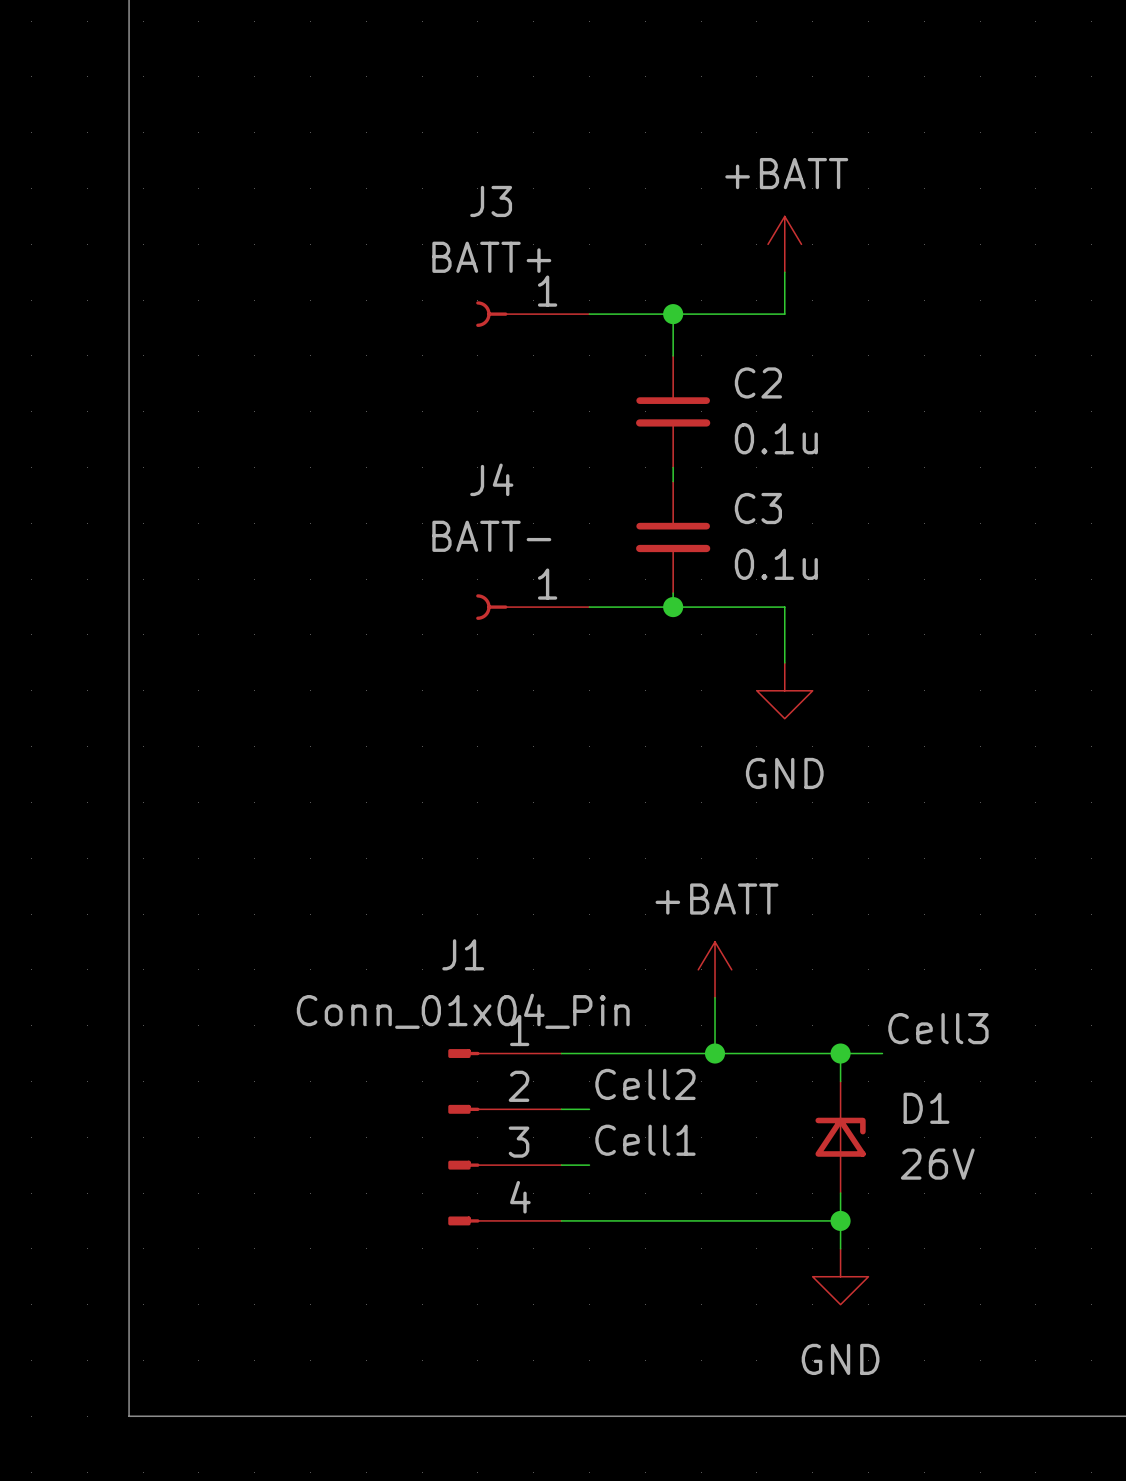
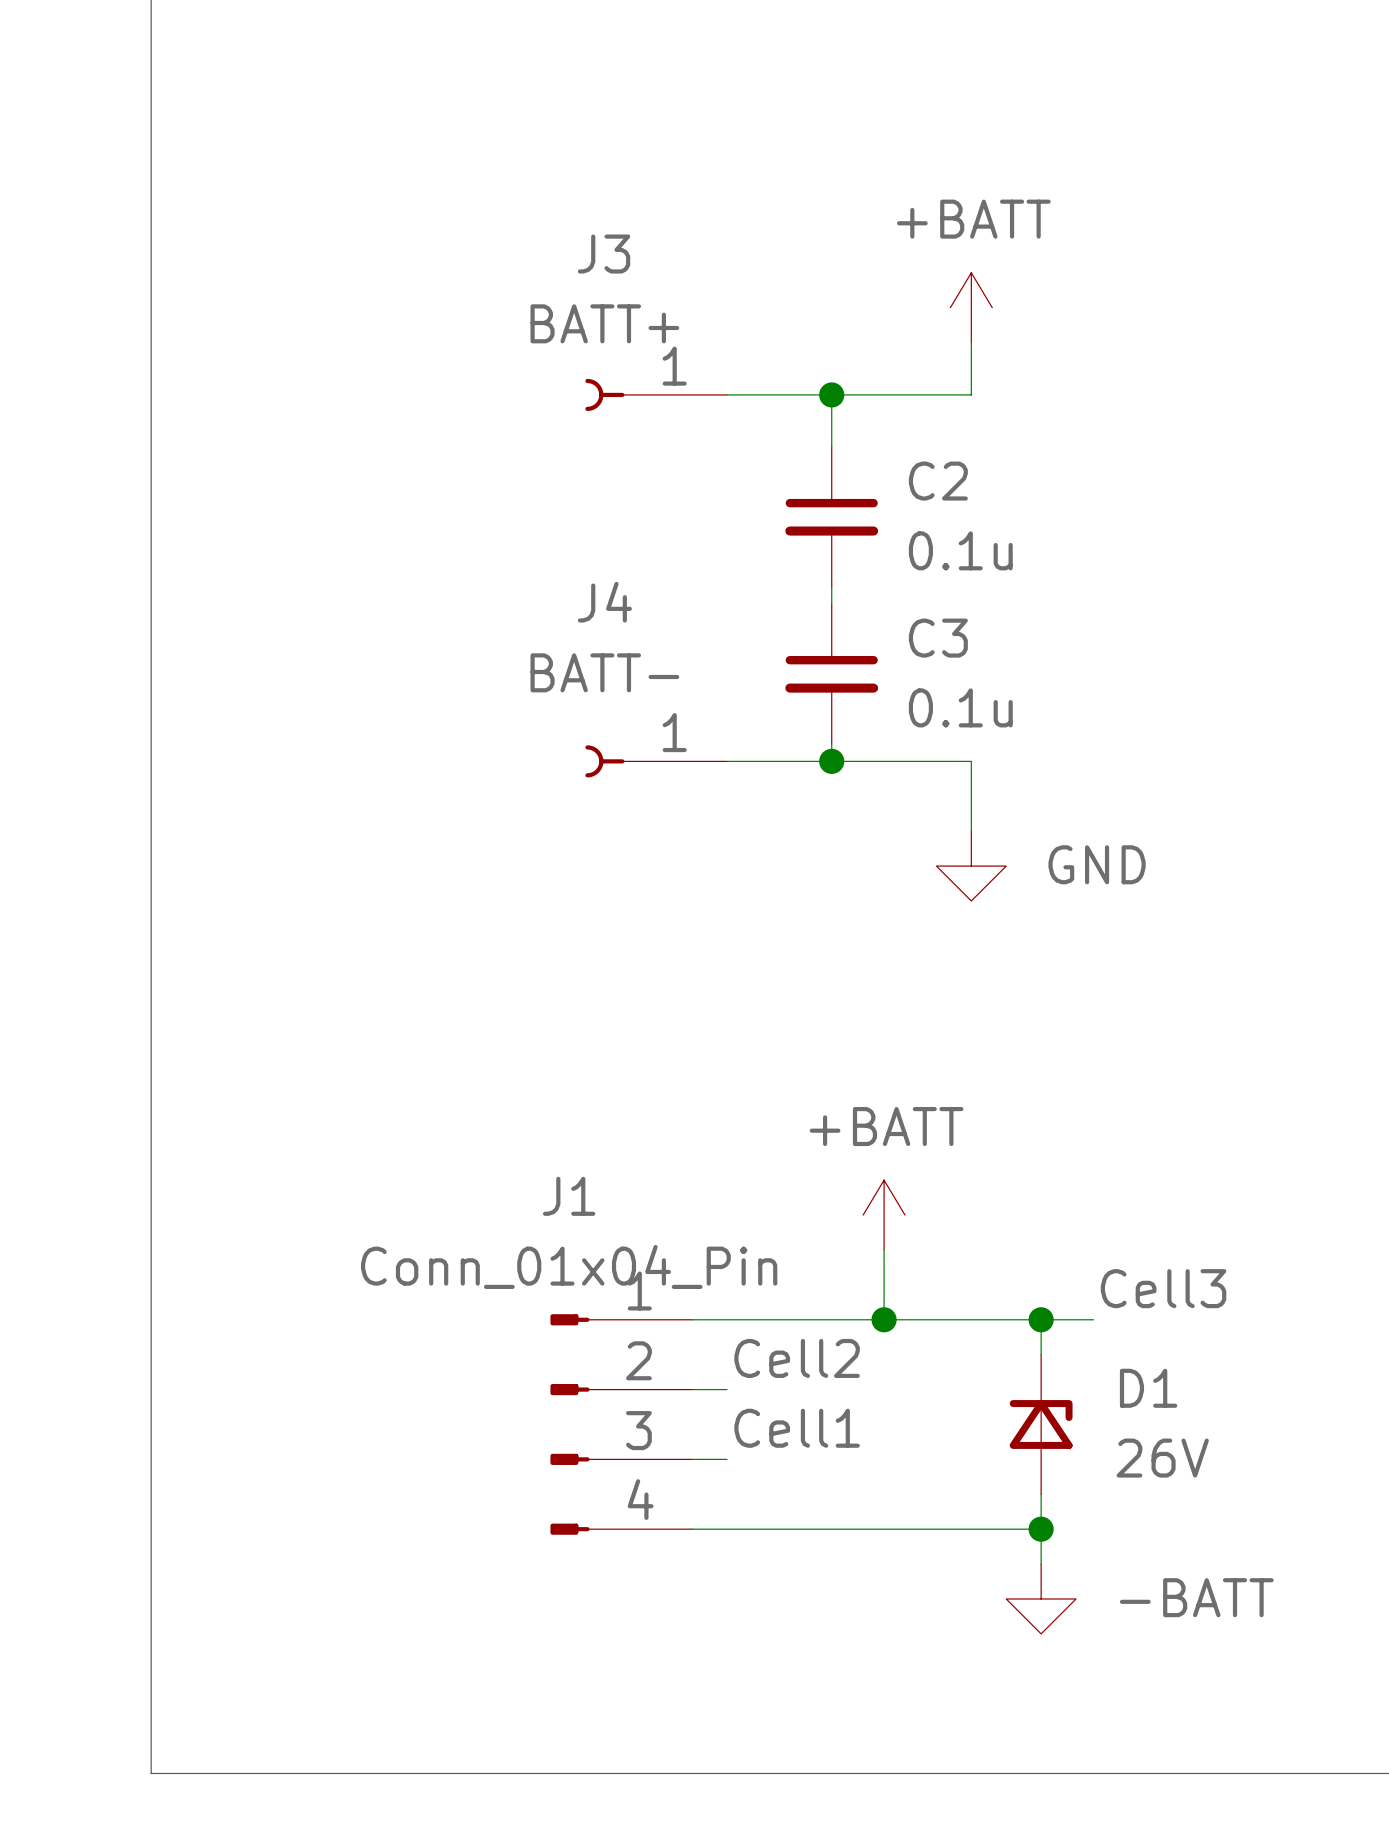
power symbol text position: GND (784, 773) -> GND (1097, 864)
power symbol: GND (840, 1276) -> -BATT (1041, 1598)

